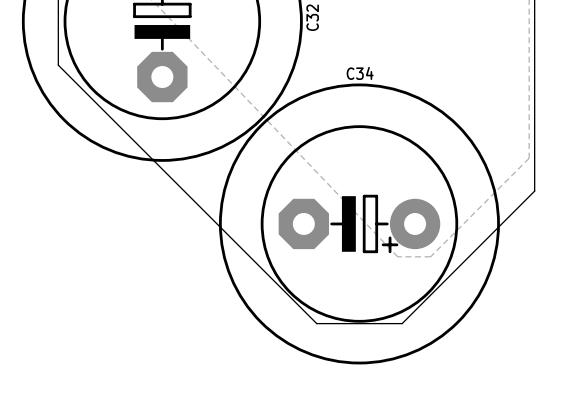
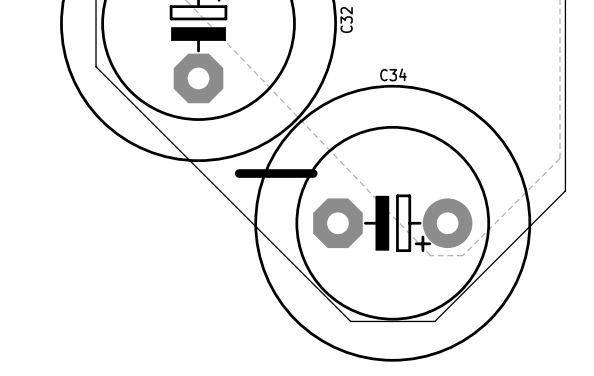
text: none -> - (276, 173)

